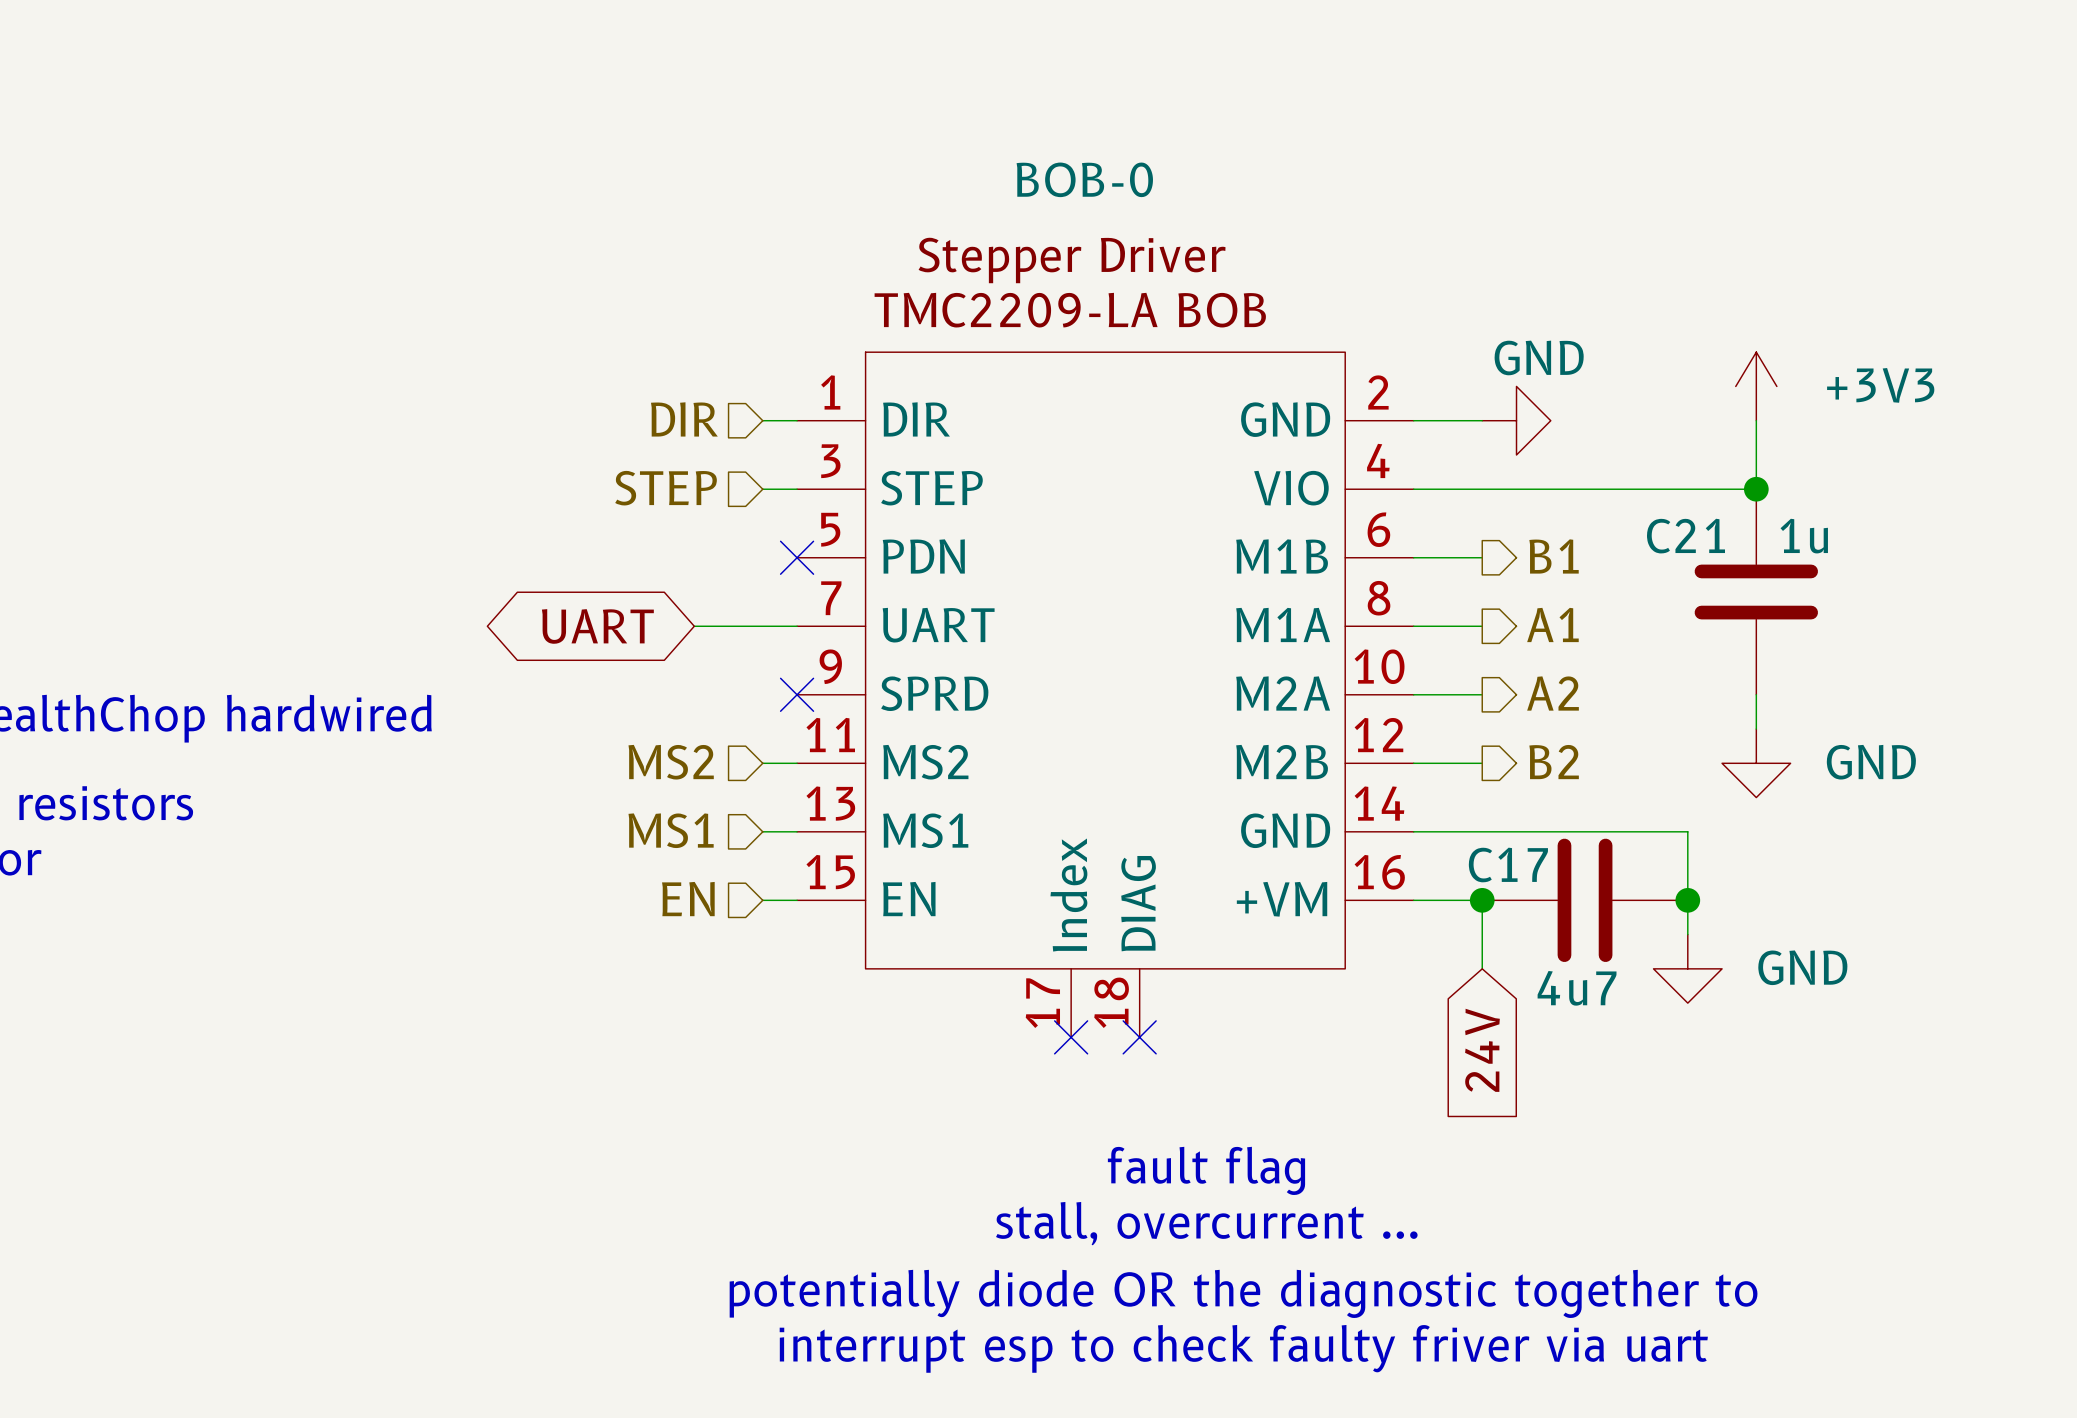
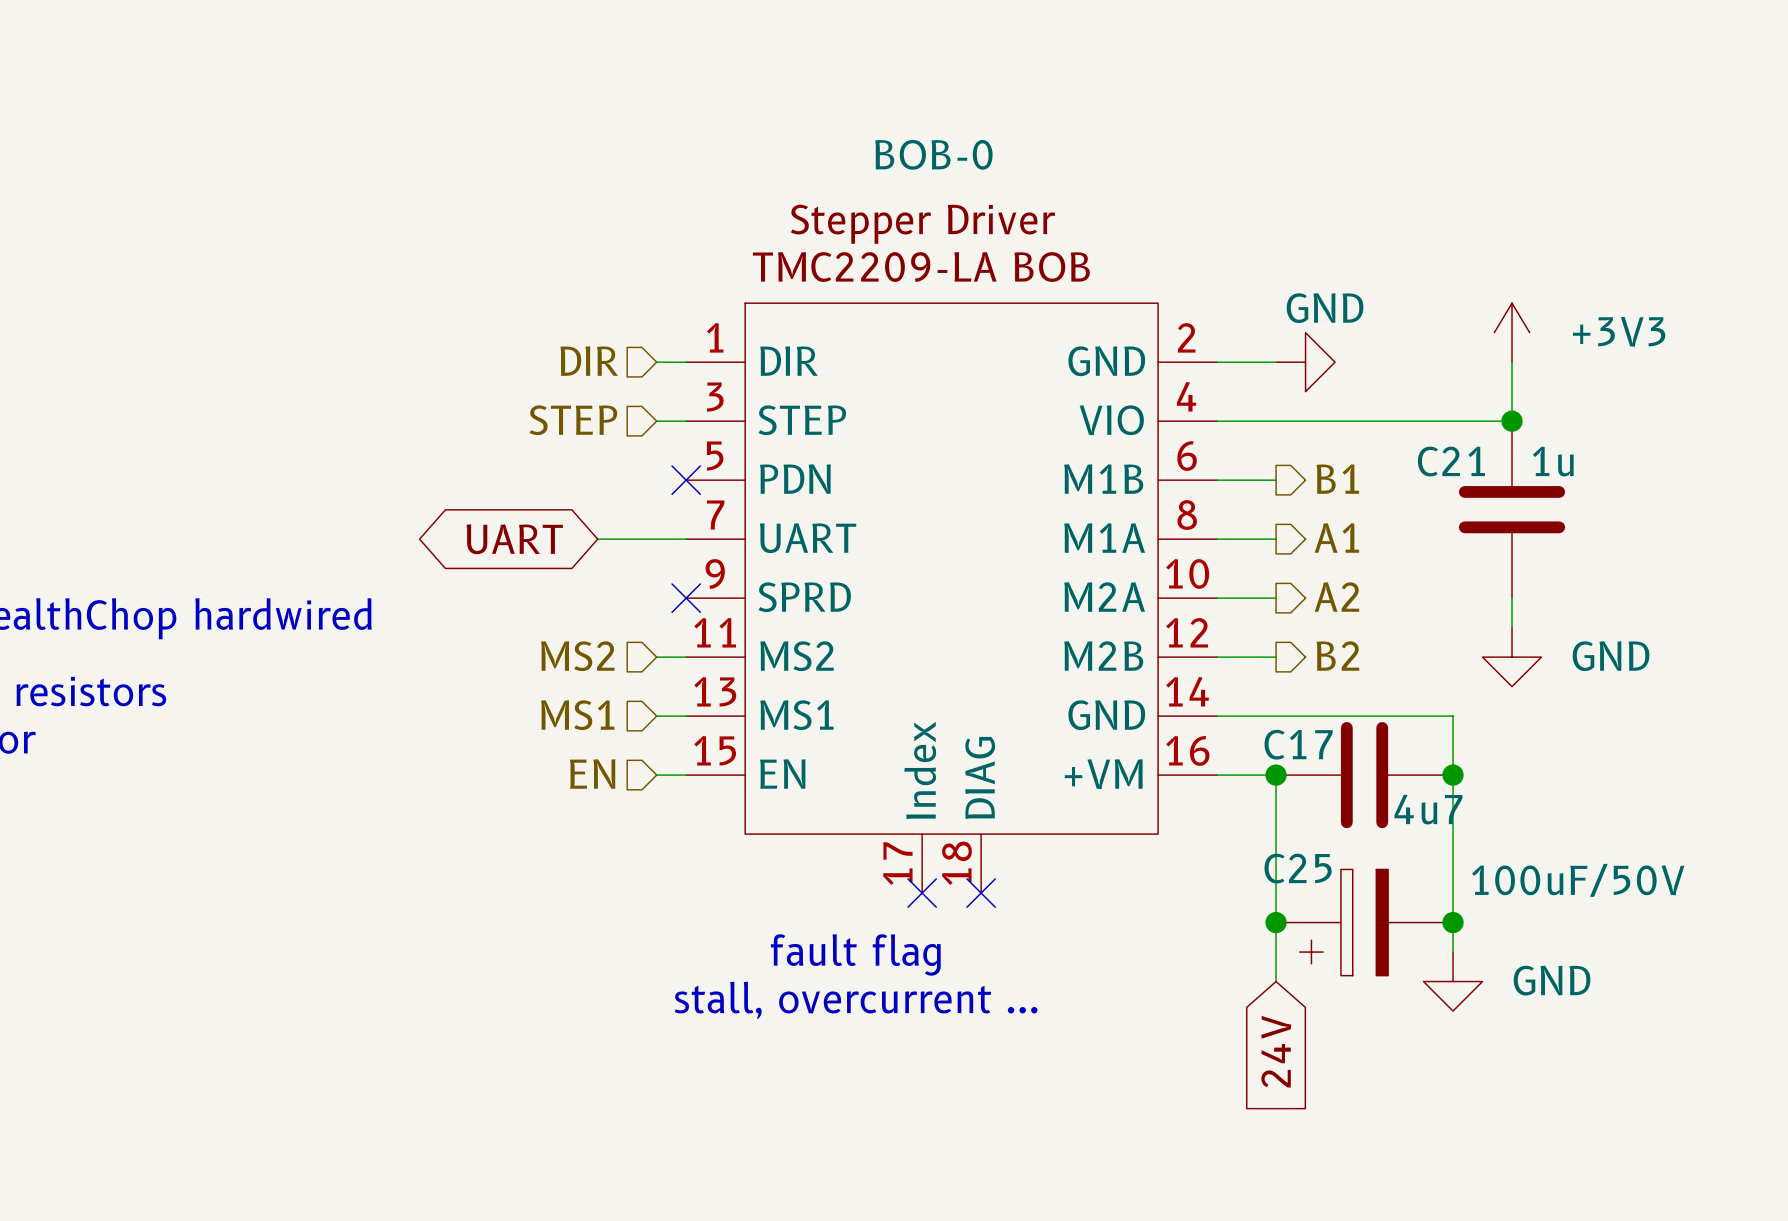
wire: none -> (1453, 804) (1453, 952)
wire: none -> (1276, 834) (1276, 981)
power symbol position: GND (1687, 968) -> GND (1453, 981)
C17 value position: 4u7 (1577, 988) -> 4u7 (1428, 809)
global label position: 24V (1482, 1050) -> 24V (1276, 1051)
junction: none -> (1276, 922)
C25: none -> 100uF/50V (1364, 922)
junction: none -> (1453, 922)
text position: fault flag (1206, 1170) -> fault flag (855, 954)
text position: stall, overcurrent ... (1206, 1223) -> stall, overcurrent ... (856, 1000)
text: potentially diode OR the diagnostic together to (1243, 1293) -> none
text: interrupt esp to check faulty friver via uart (1243, 1348) -> none

